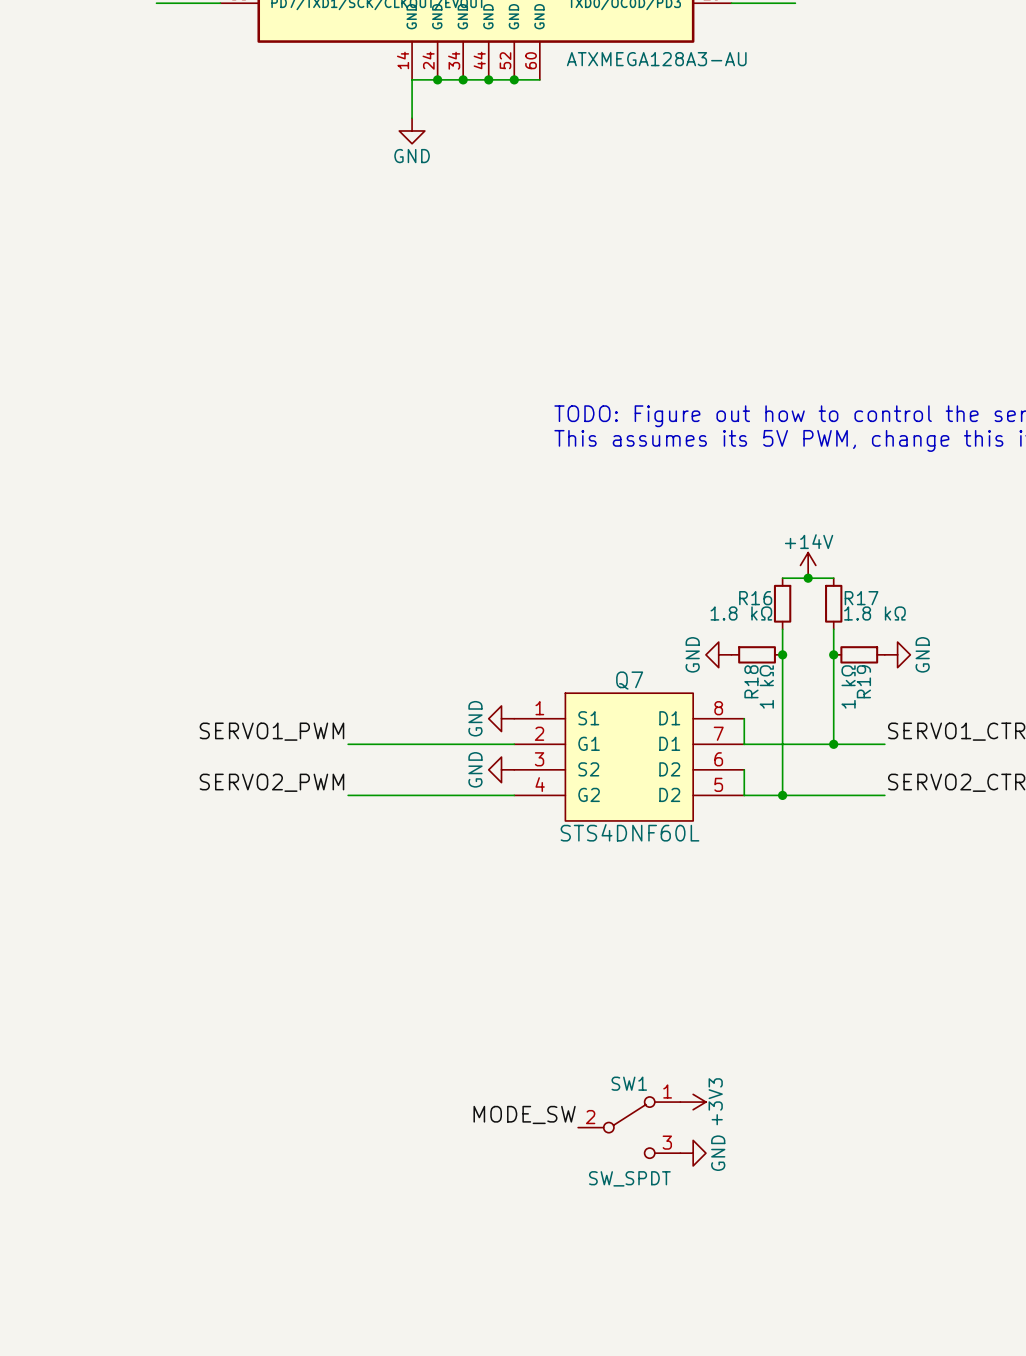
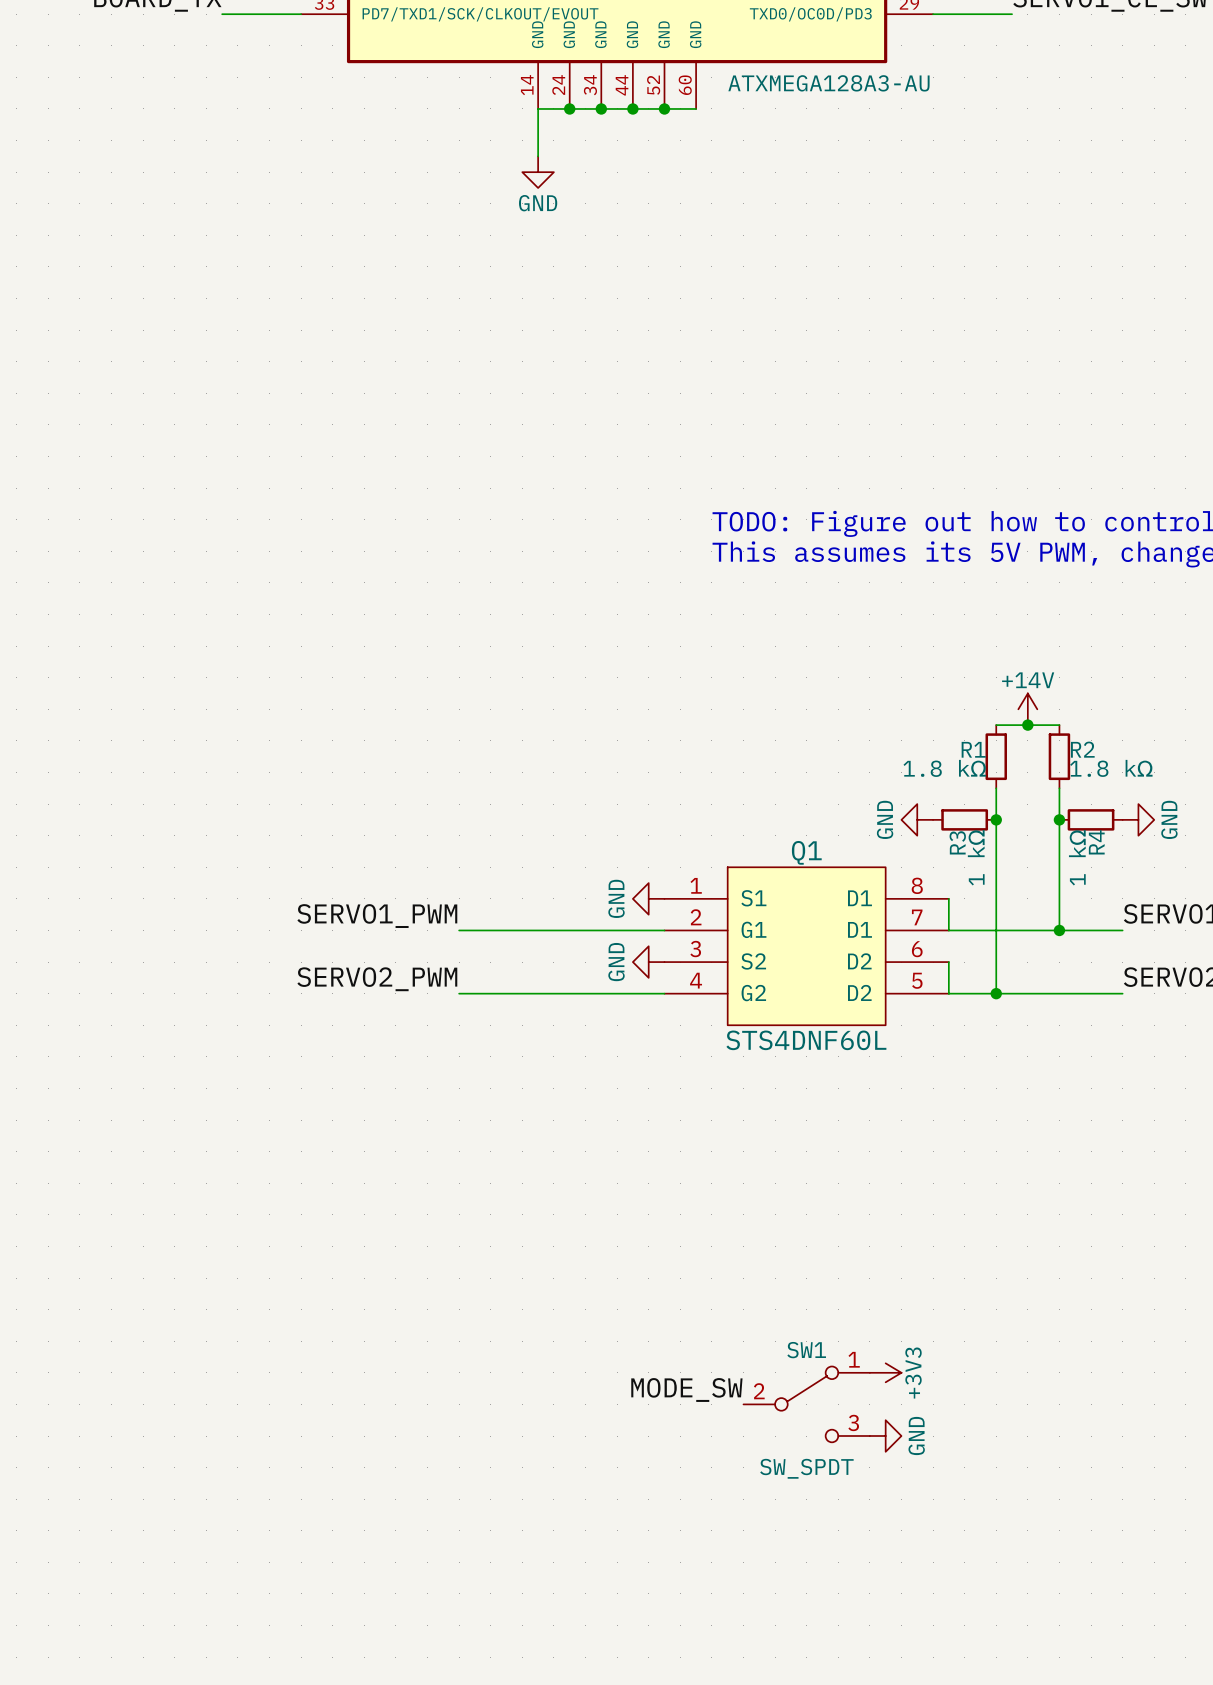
R16 name: R16 (755, 598) -> R1 (973, 749)
R17 name: R17 (861, 598) -> R2 (1082, 749)
Q7 name: Q7 (629, 680) -> Q1 (806, 852)
R18 name: R18 (751, 681) -> R3 (957, 842)
R19 name: R19 (863, 681) -> R4 (1096, 842)

